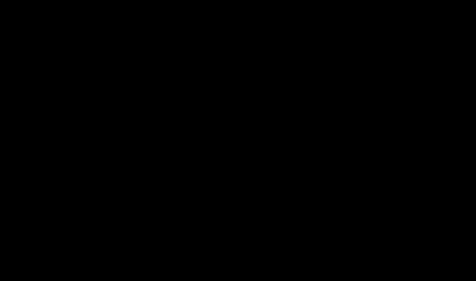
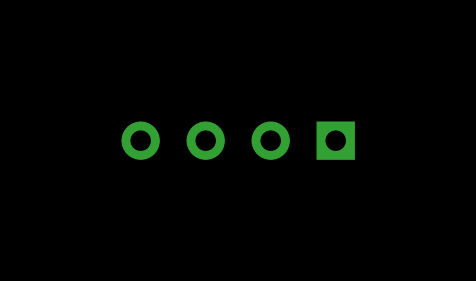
part: none -> (238, 140)

